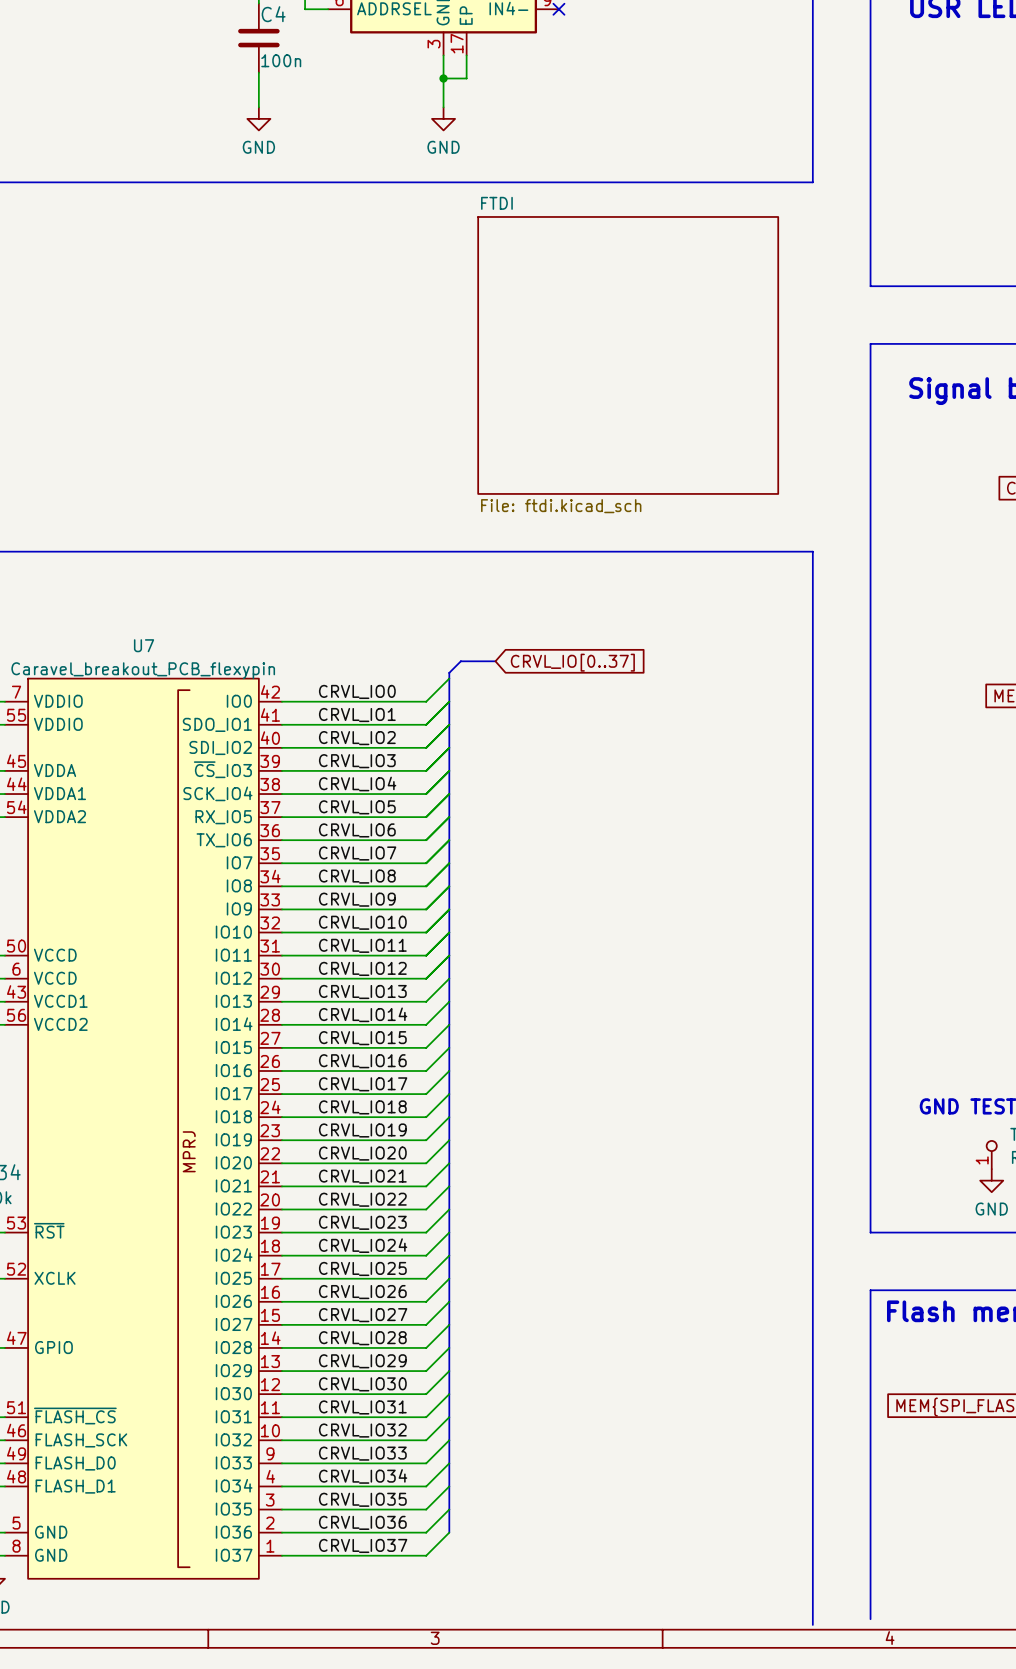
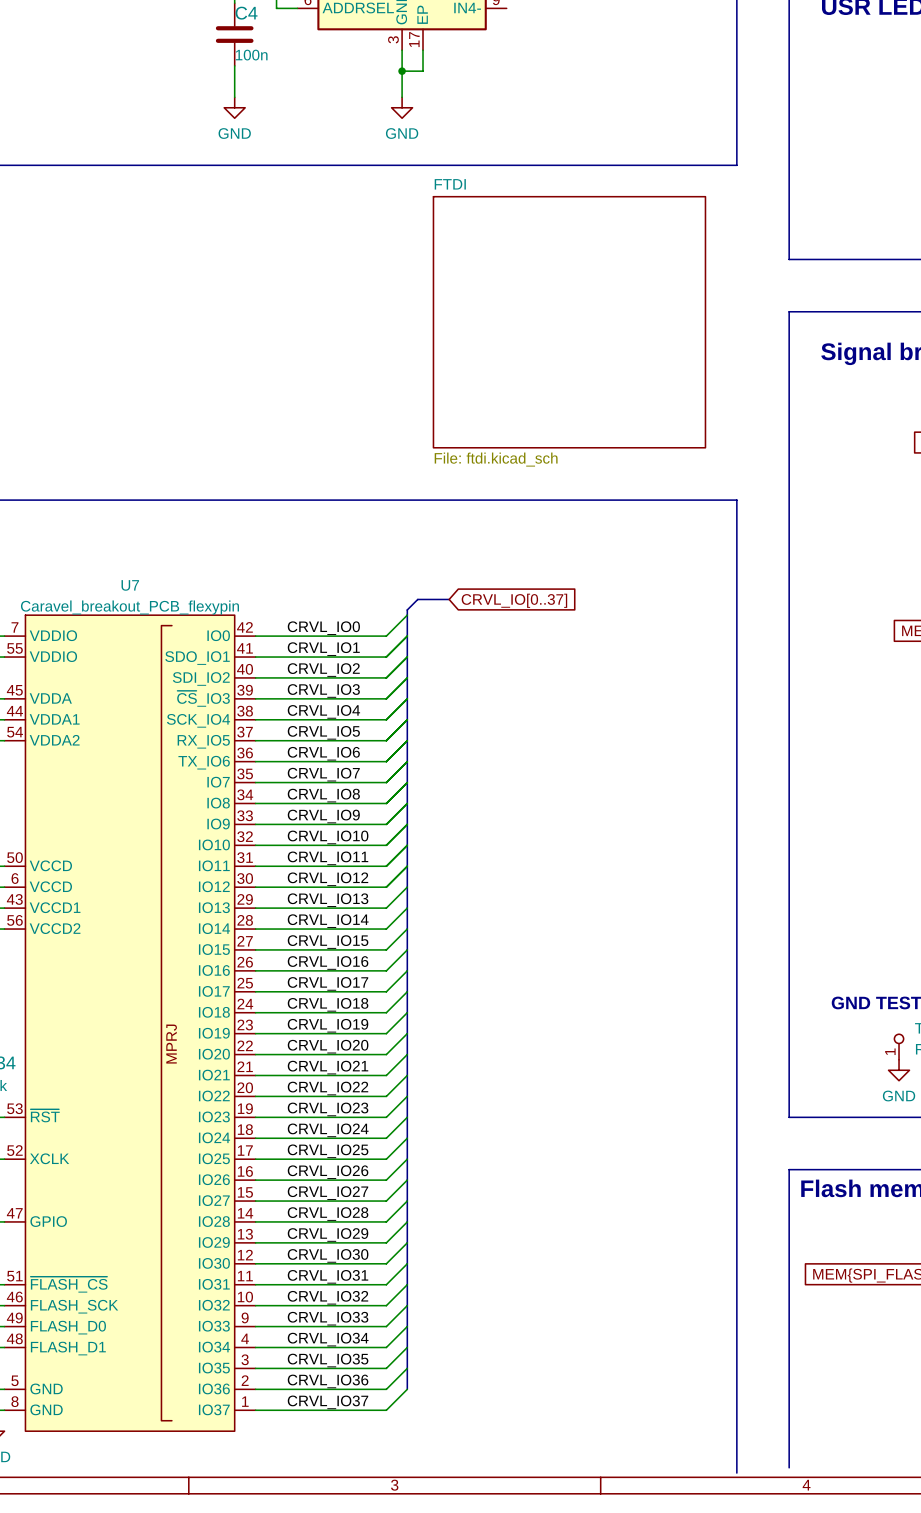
no-connect mark: (558, 9) -> none

